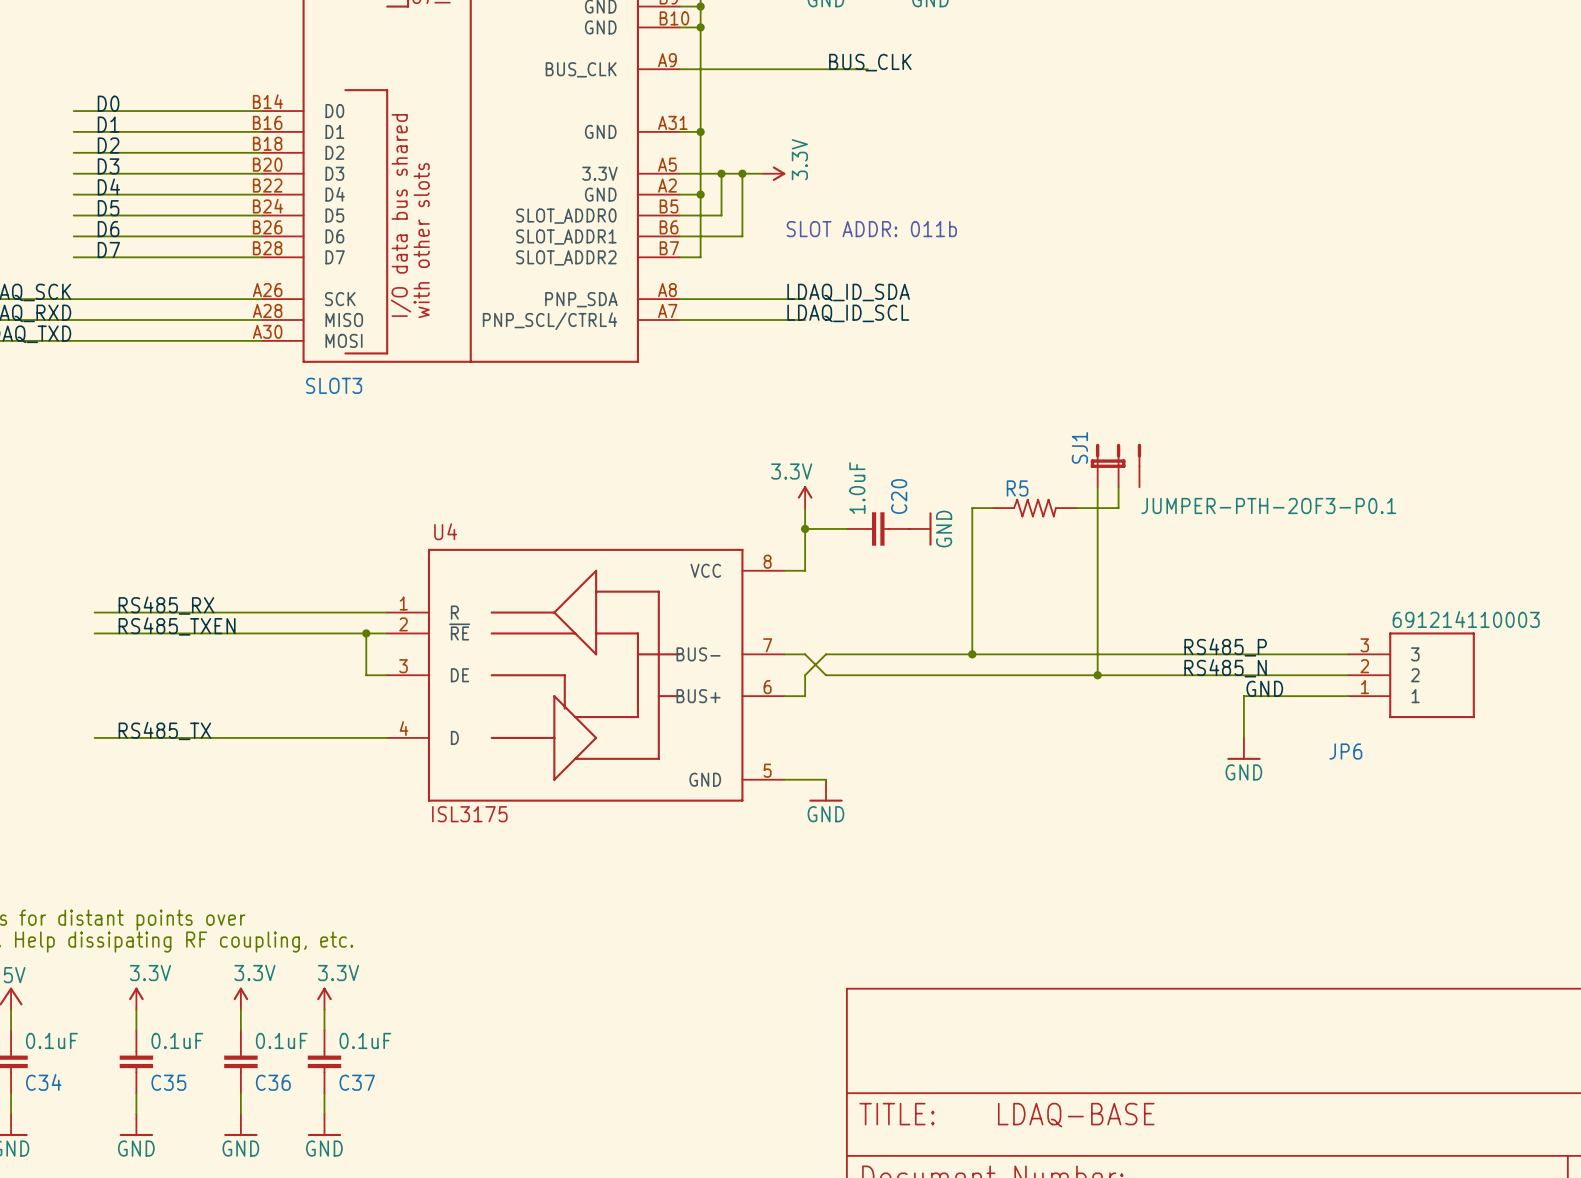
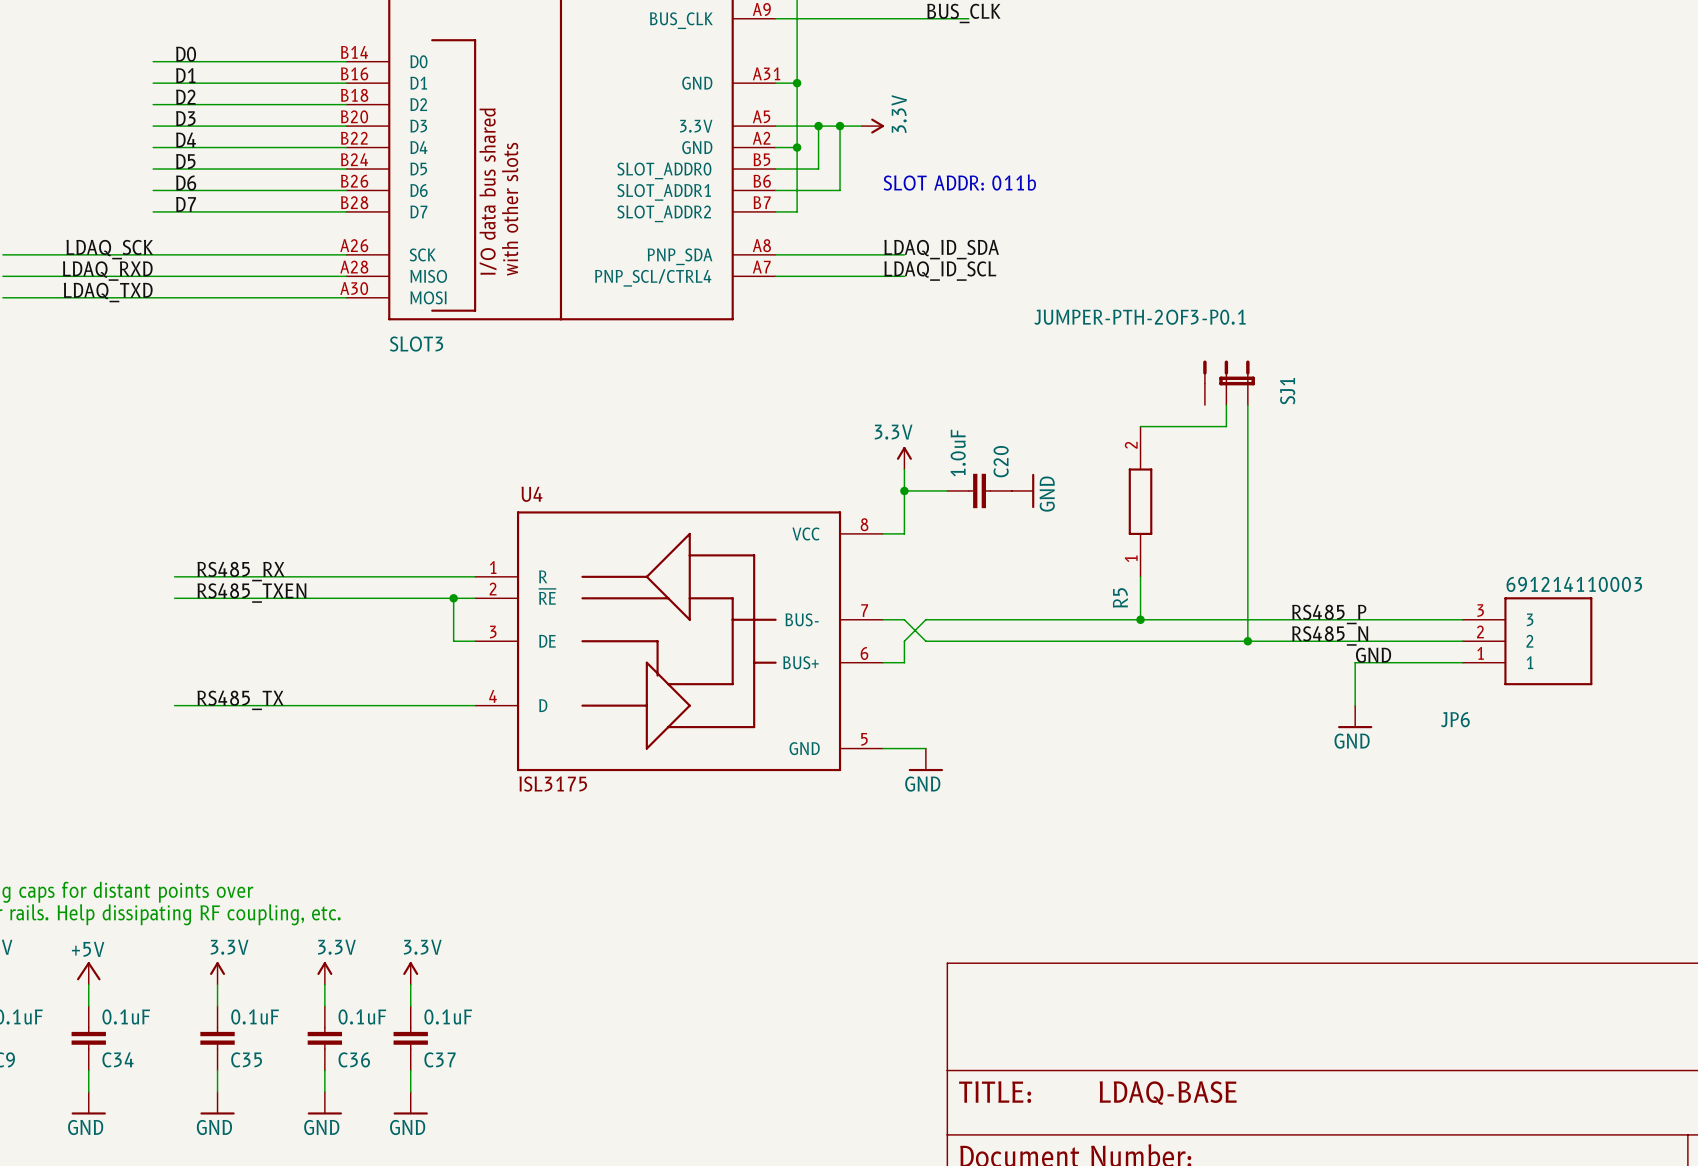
wire: none -> (1226, 405) (1226, 426) (1140, 426)
wire: none -> (1247, 405) (1247, 641)
SJ1 name position: SJ1 (1079, 447) -> SJ1 (1287, 391)
SJ1 flip: as is (1115, 455) -> left-right (1229, 372)
SJ1 position: (1115, 465) -> (1229, 382)
wire: (1097, 487) (1097, 675) -> none
wire: (1118, 487) (1118, 508) (1076, 508) -> none
R5 name position: R5 (1017, 488) -> R5 (1120, 597)
R5 symbol: [993, 499, 1077, 518] -> [1128, 426, 1153, 577]
SJ1 value position: JUMPER-PTH-2OF3-P0.1 (1268, 505) -> JUMPER-PTH-2OF3-P0.1 (1139, 317)
wire: (993, 508) (972, 508) (972, 654) -> none
wire: none -> (1140, 576) (1140, 619)
junction: (972, 654) -> none
junction: none -> (1140, 619)
junction: (1097, 675) -> none
junction: none -> (1247, 641)

